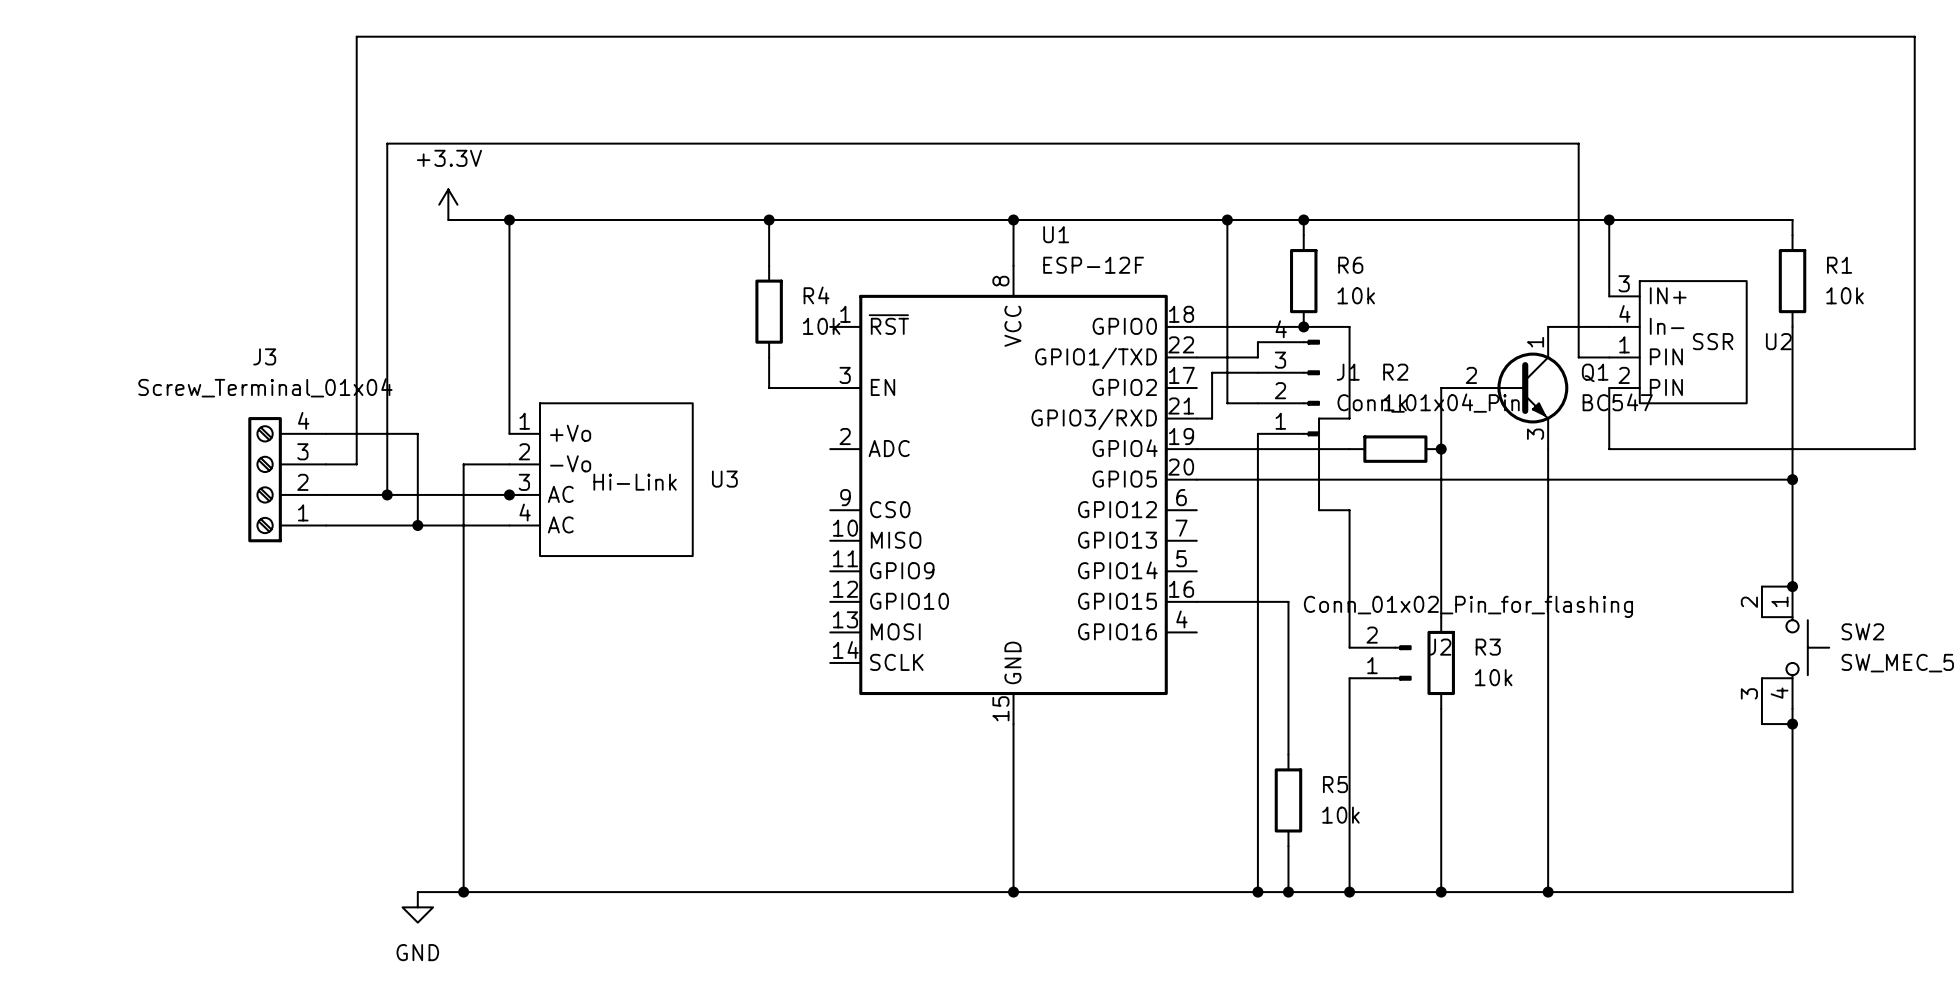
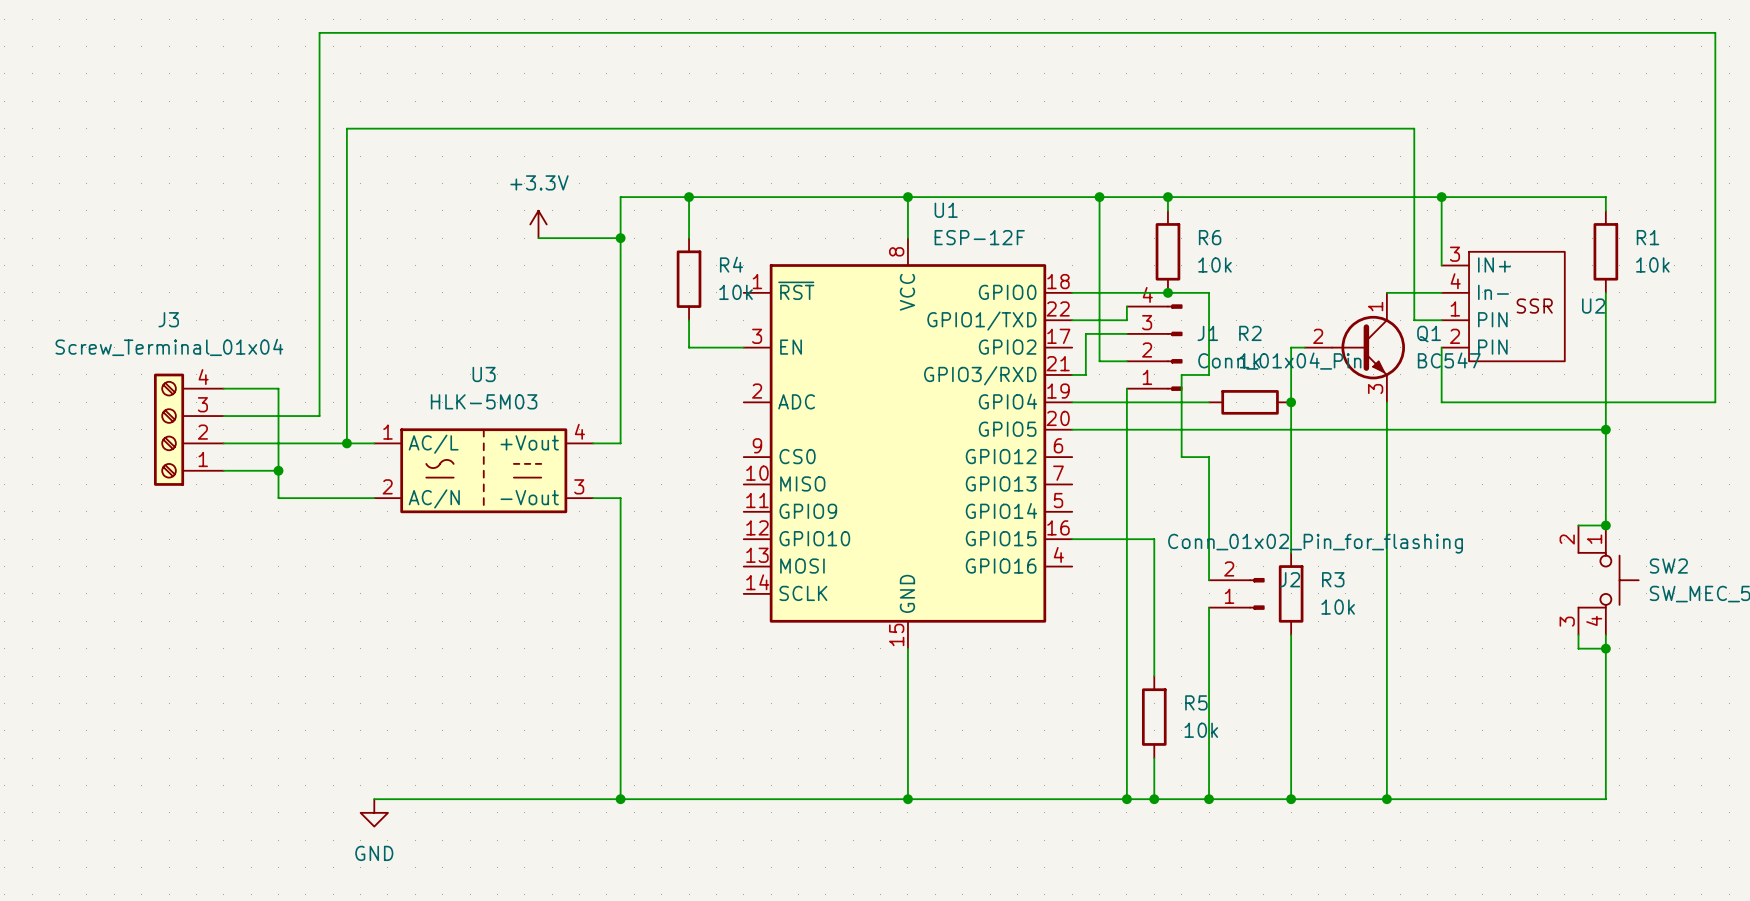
power symbol position: +3.3V (448, 204) -> +3.3V (538, 224)
wire: (448, 220) (692, 220) -> (593, 443) (620, 443) (620, 197)
wire: (509, 220) (509, 433) -> none
junction: (509, 220) -> none
wire: none -> (538, 238) (620, 238)
junction: none -> (620, 238)
U3 symbol: [509, 403, 693, 557] -> [374, 428, 594, 514]
wire: none -> (223, 388) (278, 388) (278, 498) (374, 498)
wire: (326, 433) (417, 433) (417, 525) -> none
U3 value: none -> HLK-5M03 (484, 401)
wire: (509, 464) (463, 464) (463, 892) -> none
J3 position: (287, 479) -> (188, 429)
U3 name position: U3 (724, 479) -> U3 (484, 374)
junction: (509, 494) -> none
junction: none -> (278, 470)
wire: (326, 525) (509, 525) -> none
junction: (417, 525) -> none
wire: none -> (593, 498) (620, 498) (620, 799)
junction: (463, 892) -> none
junction: none -> (620, 799)

